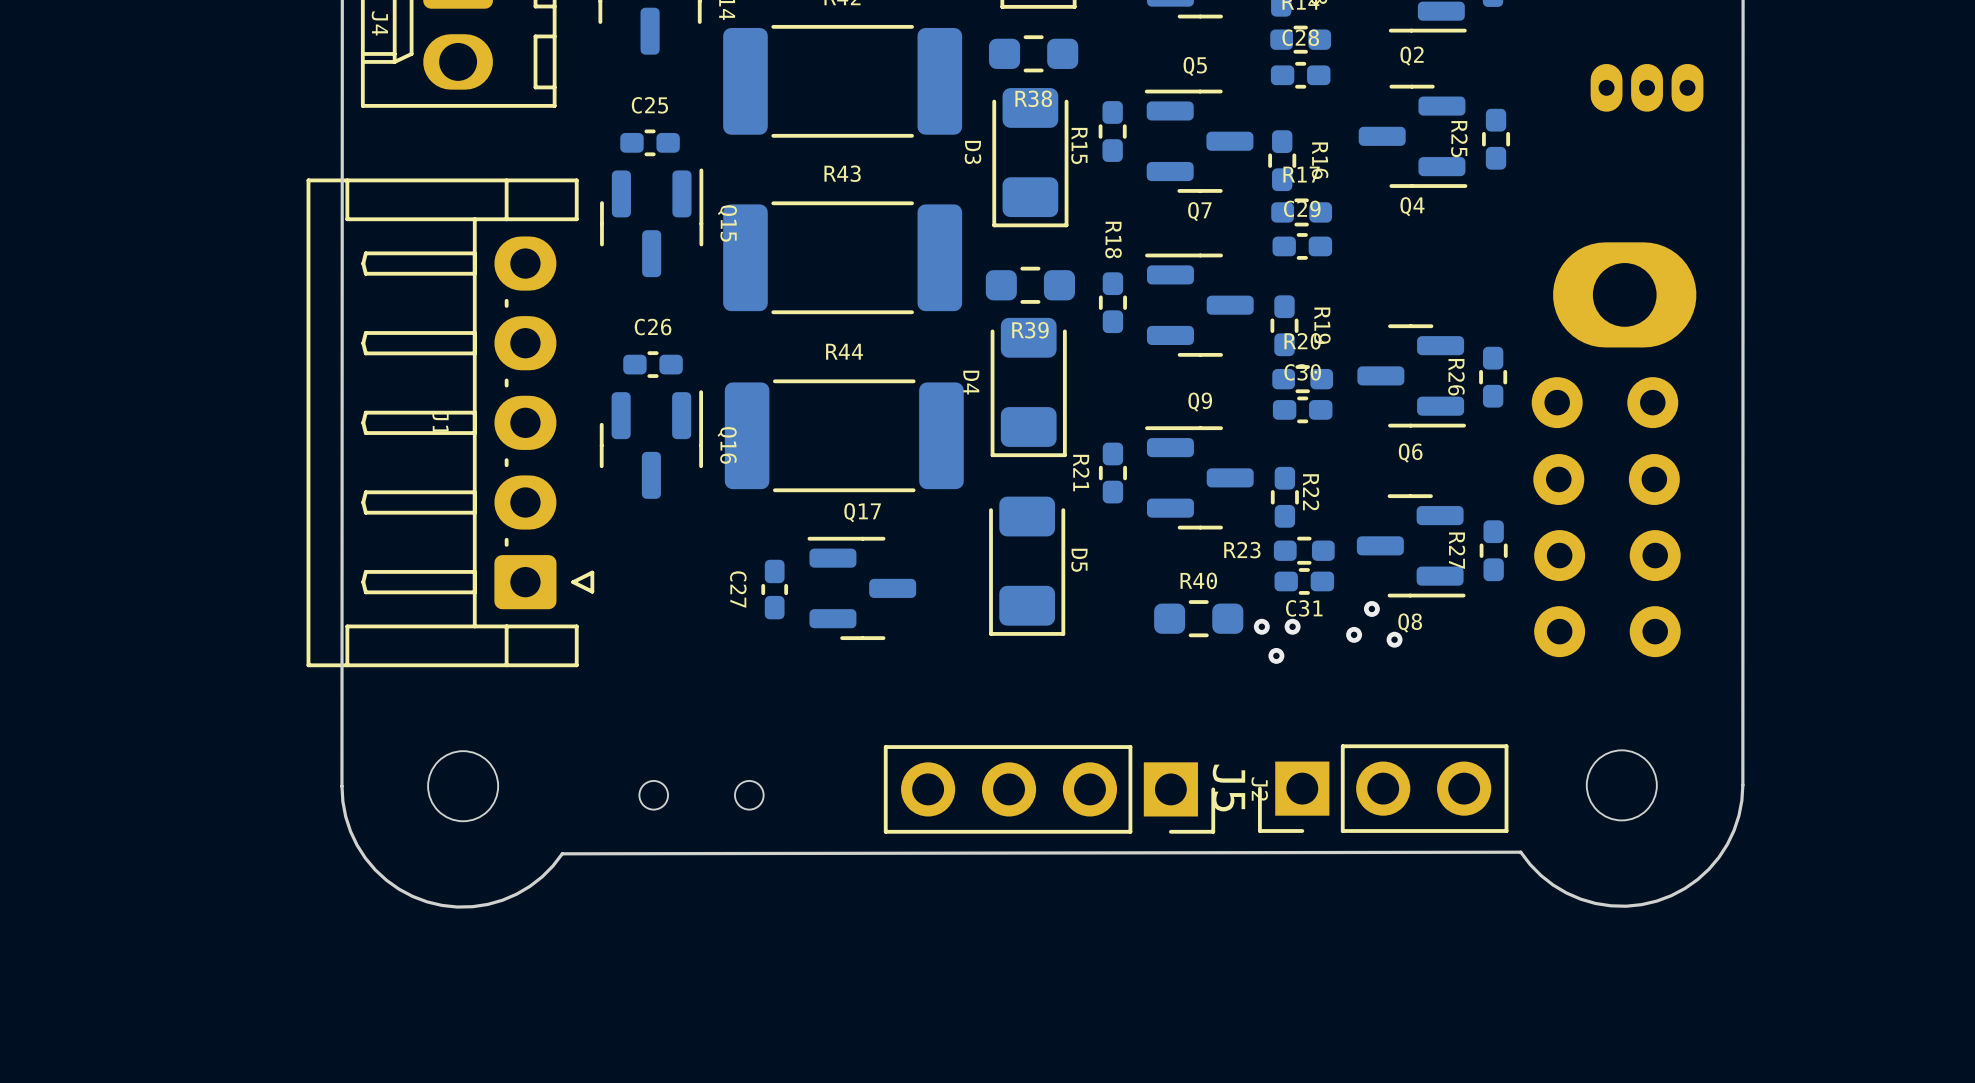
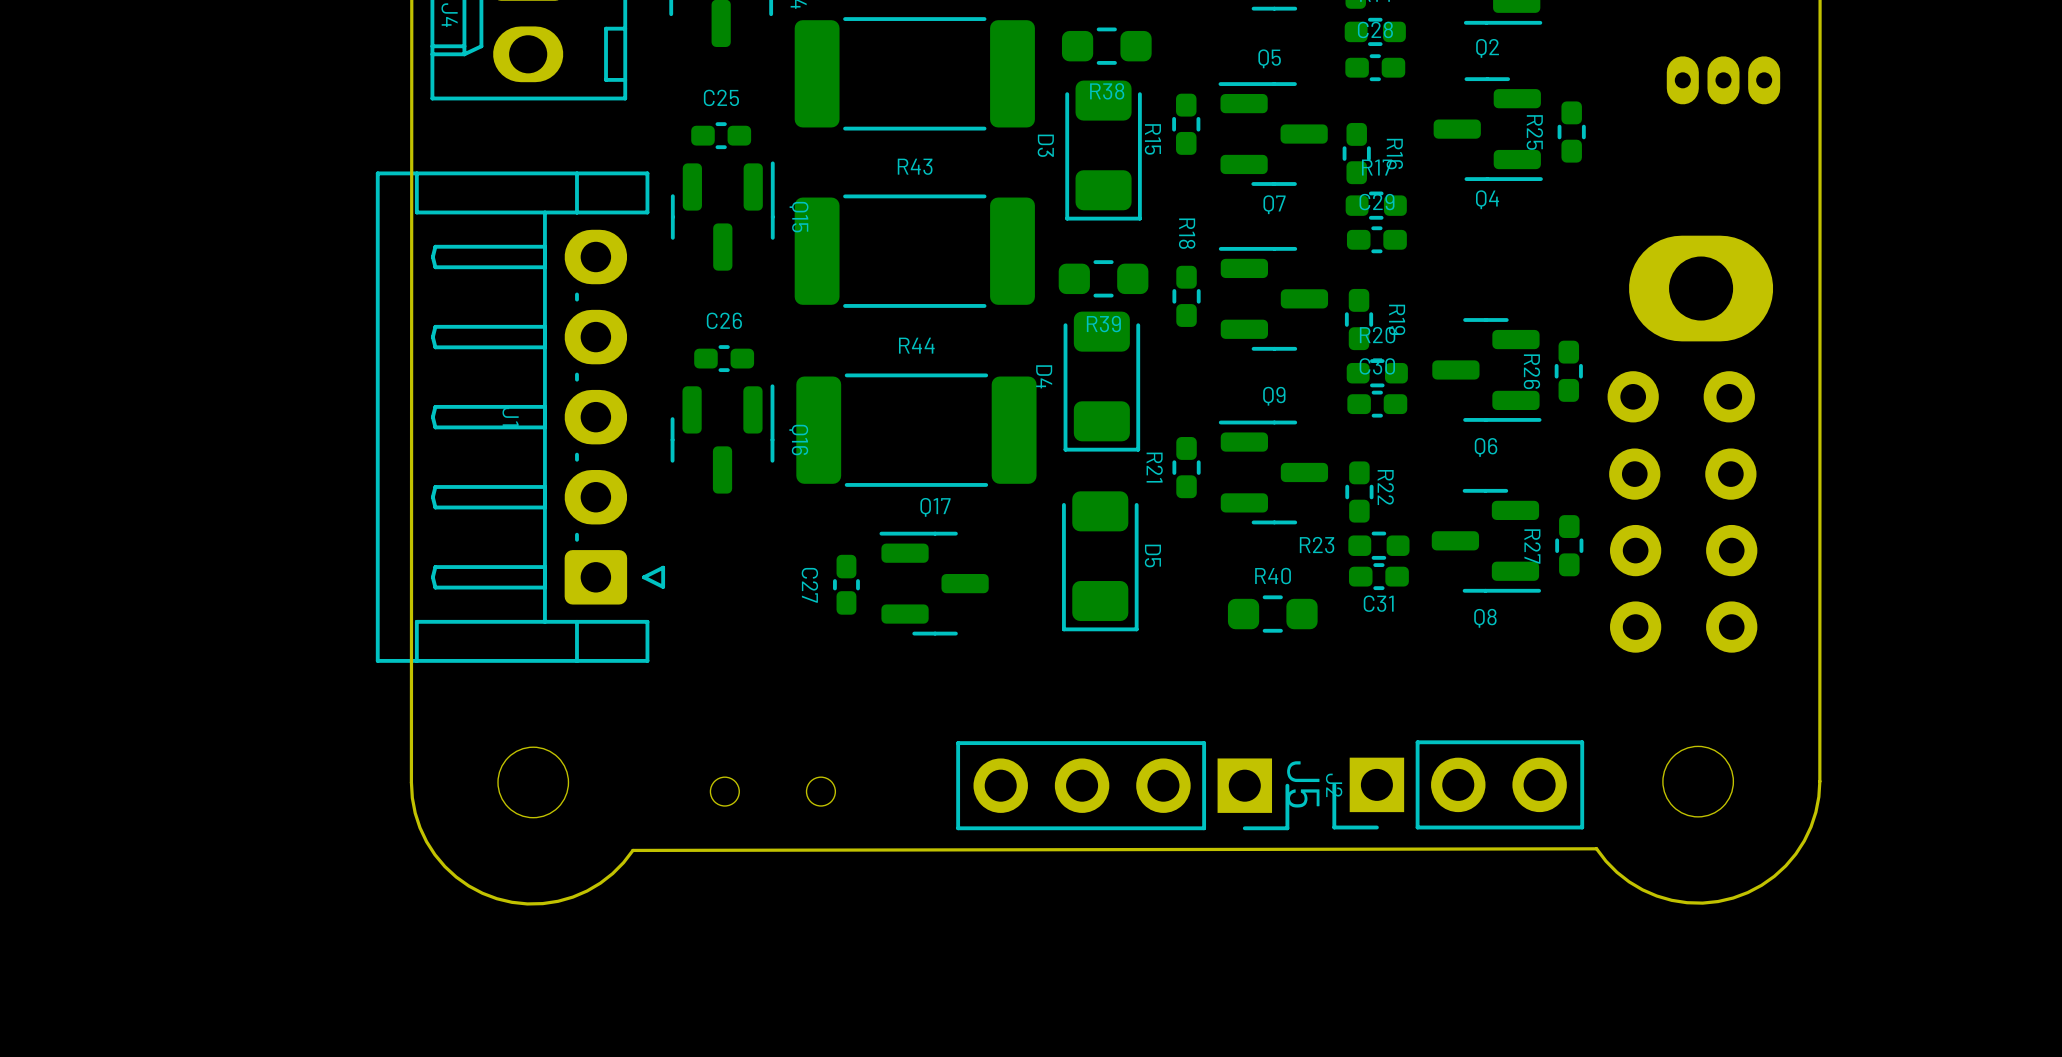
via: (1371, 608) -> none
via: (1261, 626) -> none
via: (1292, 626) -> none
via: (1354, 634) -> none
via: (1394, 639) -> none
via: (1276, 655) -> none

